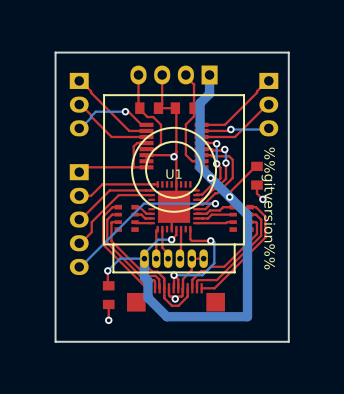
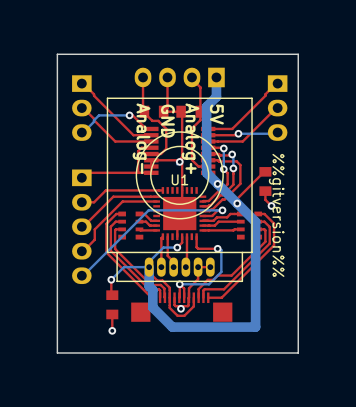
text: none -> 5V (216, 114)
text: none -> GND (167, 121)
text: none -> Analog- (141, 138)
text: none -> Analog+ (190, 138)

